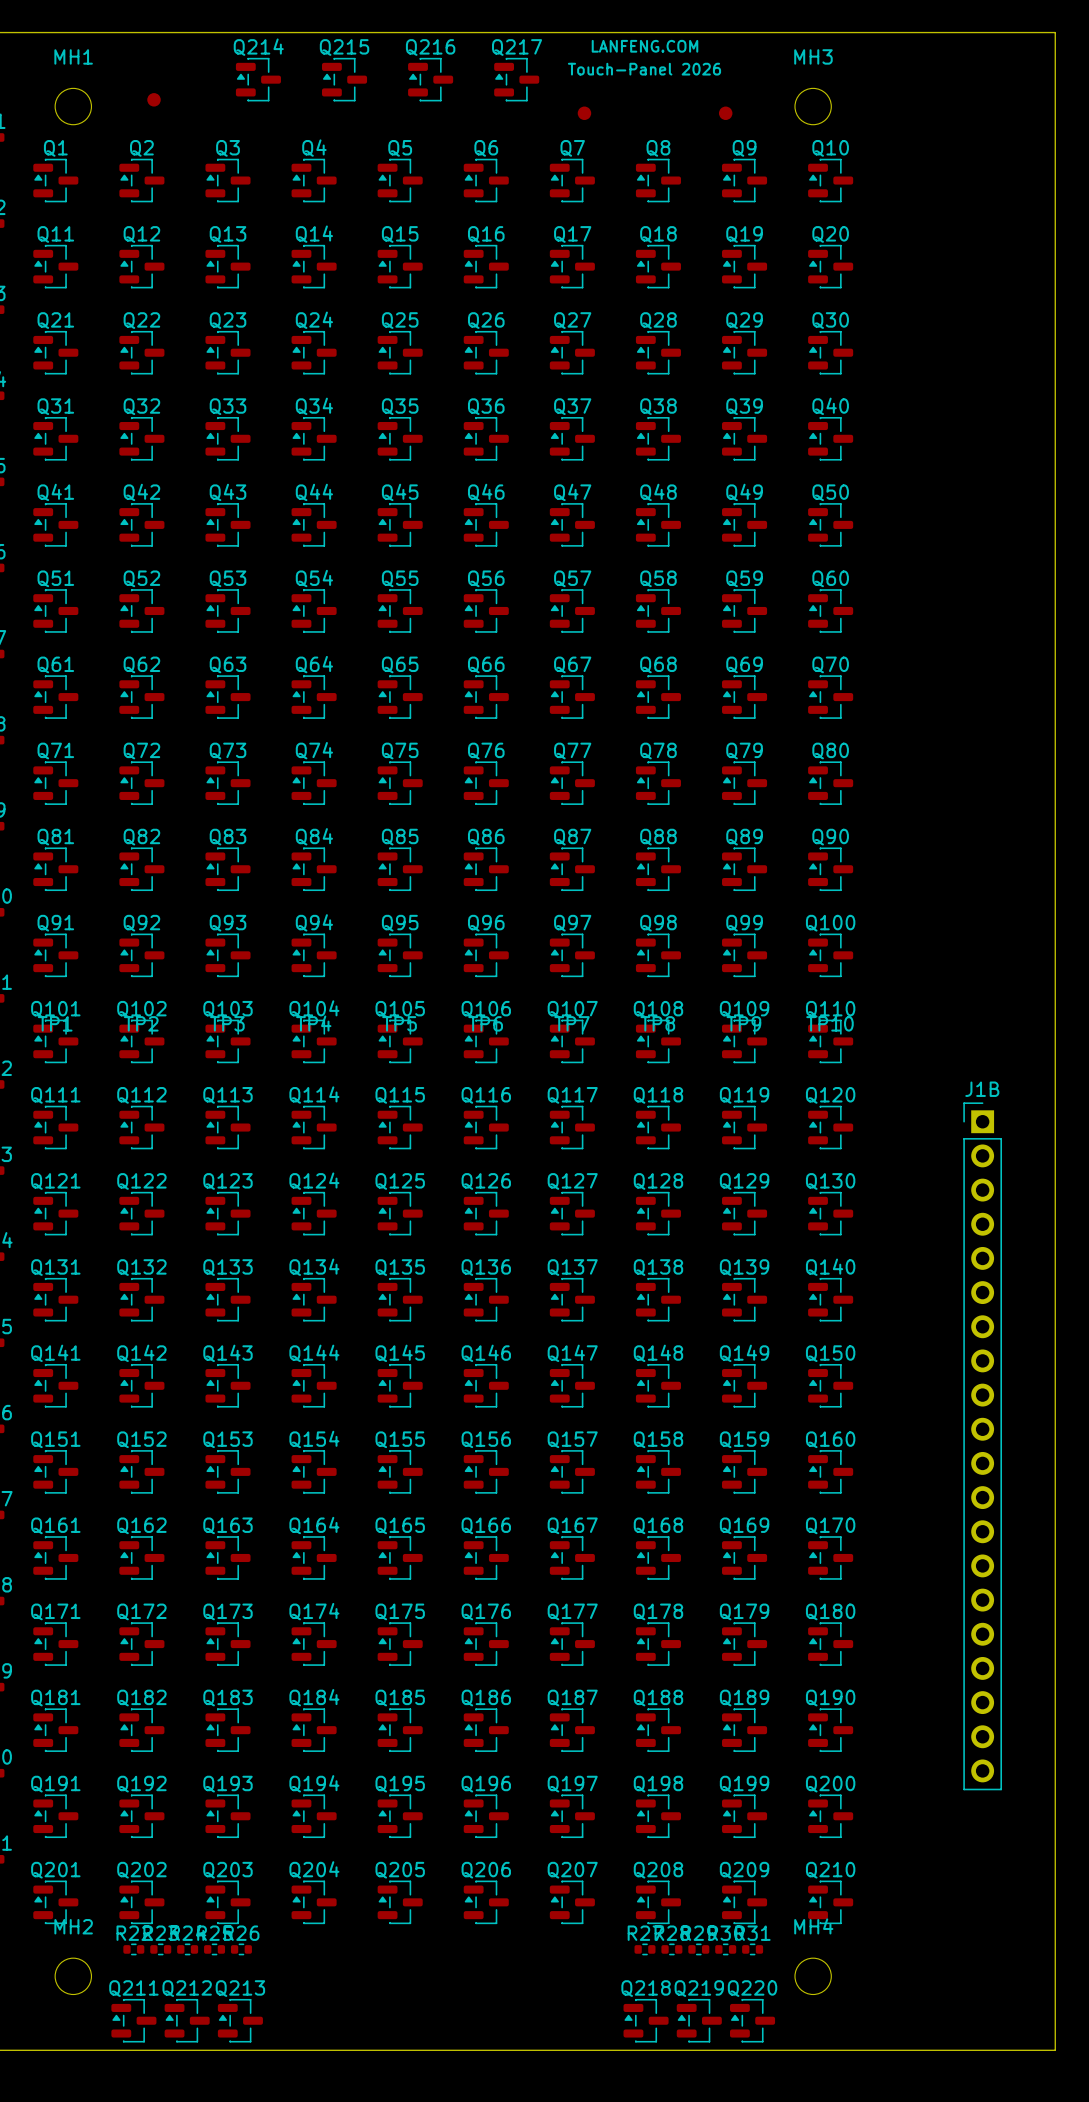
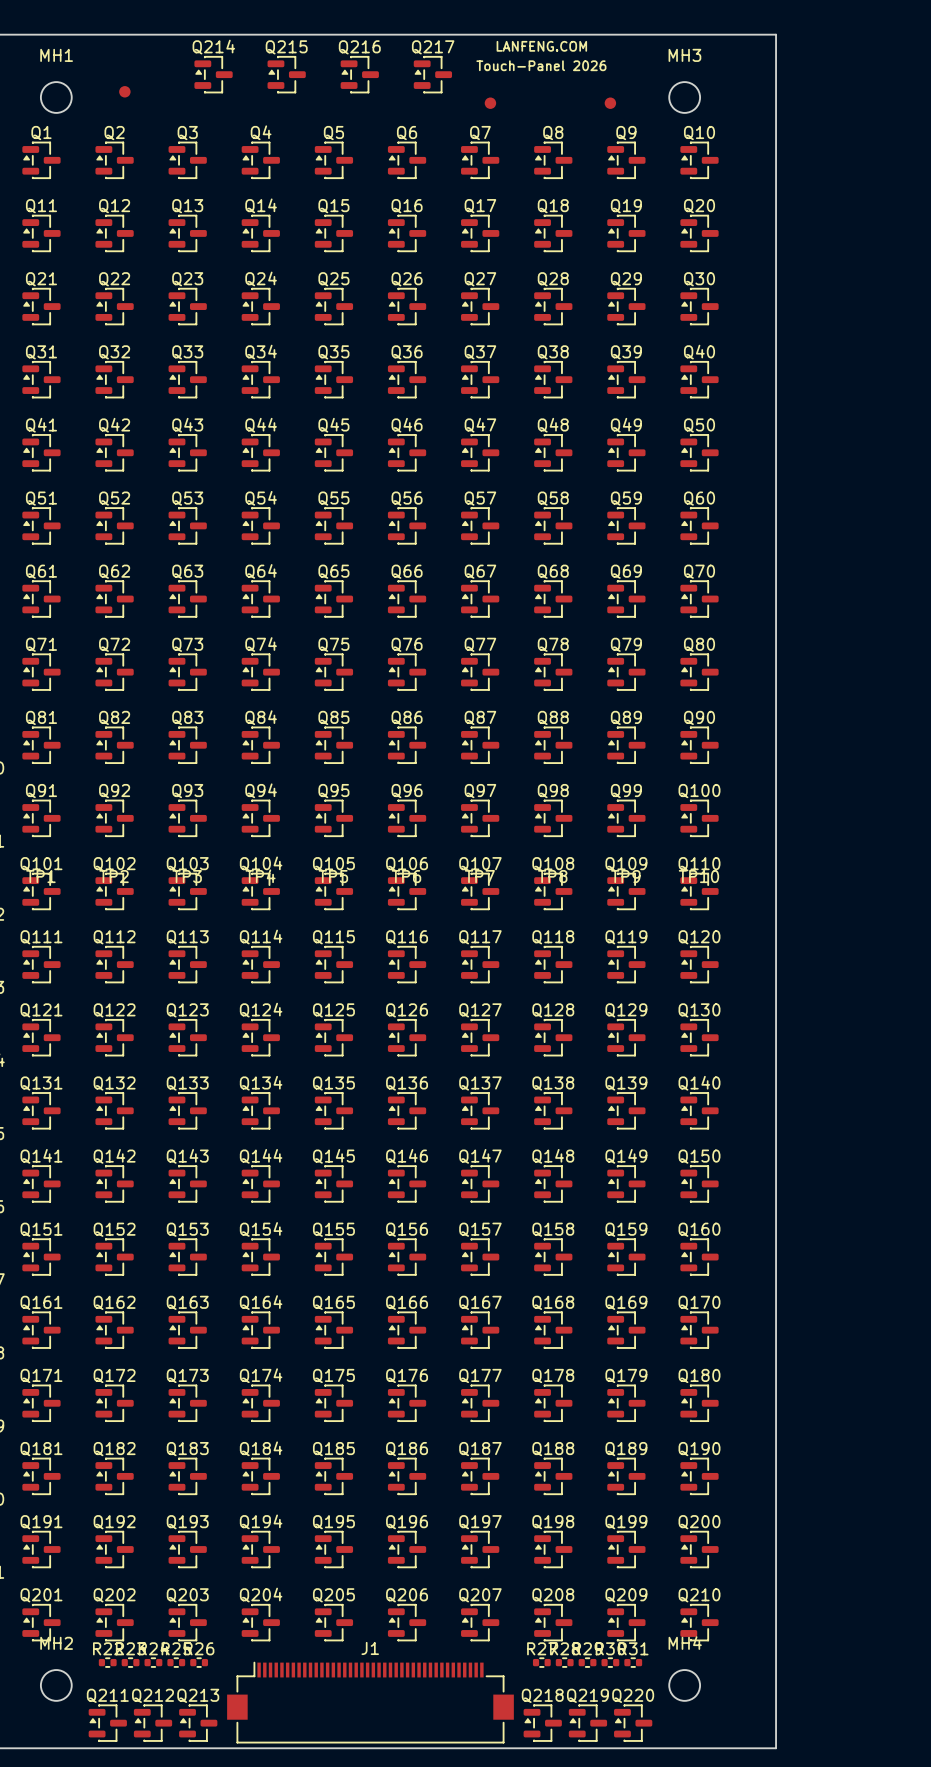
board edge: (920, 32) (1055, 32) (1055, 2050) (920, 2050) -> (776, 34) (776, 1748)
J1B: (982, 1446) -> none
J1: none -> (370, 1702)

